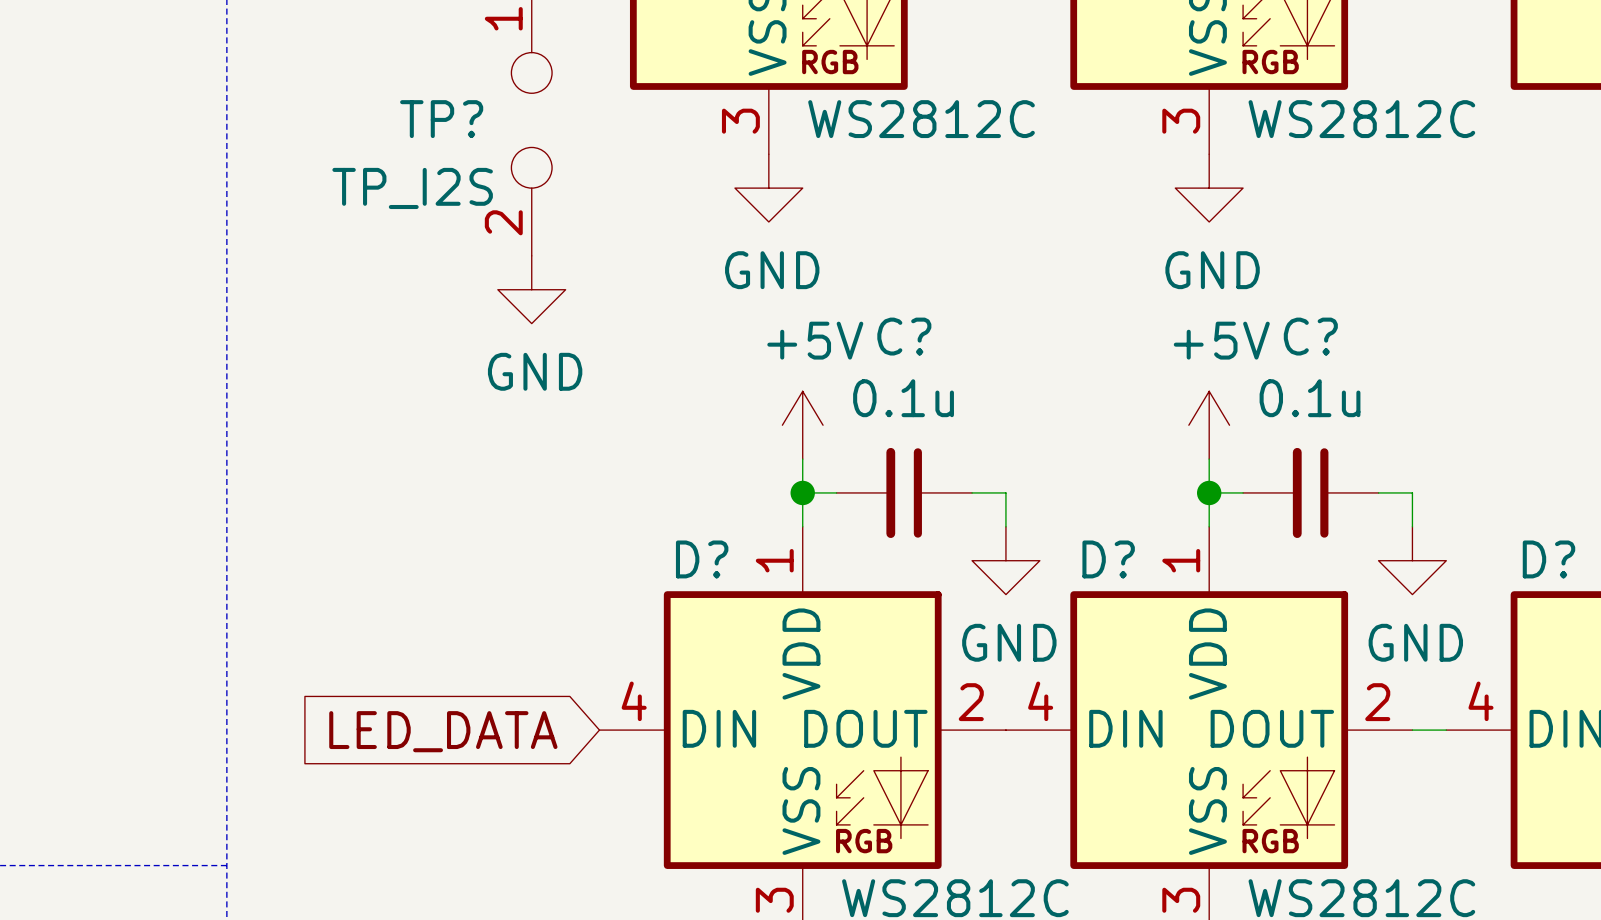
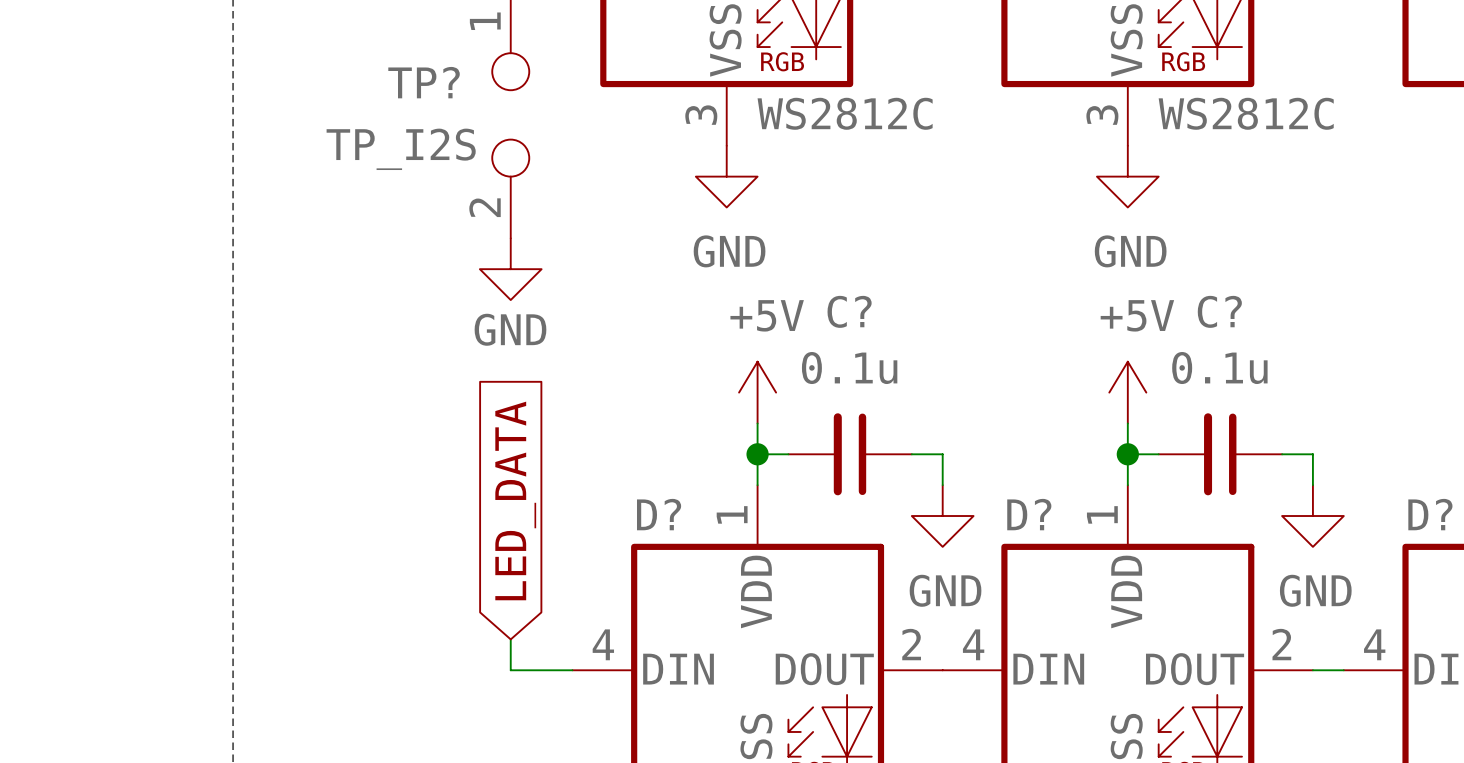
TP? name position: TP? (441, 119) -> TP? (424, 82)
TP? value position: TP_I2S (412, 188) -> TP_I2S (401, 149)
power symbol text position: GND (535, 371) -> GND (510, 329)
wire: none -> (510, 639) (510, 670) (572, 670)
global label rotation: 0° (443, 731) -> 90° clockwise (515, 500)

